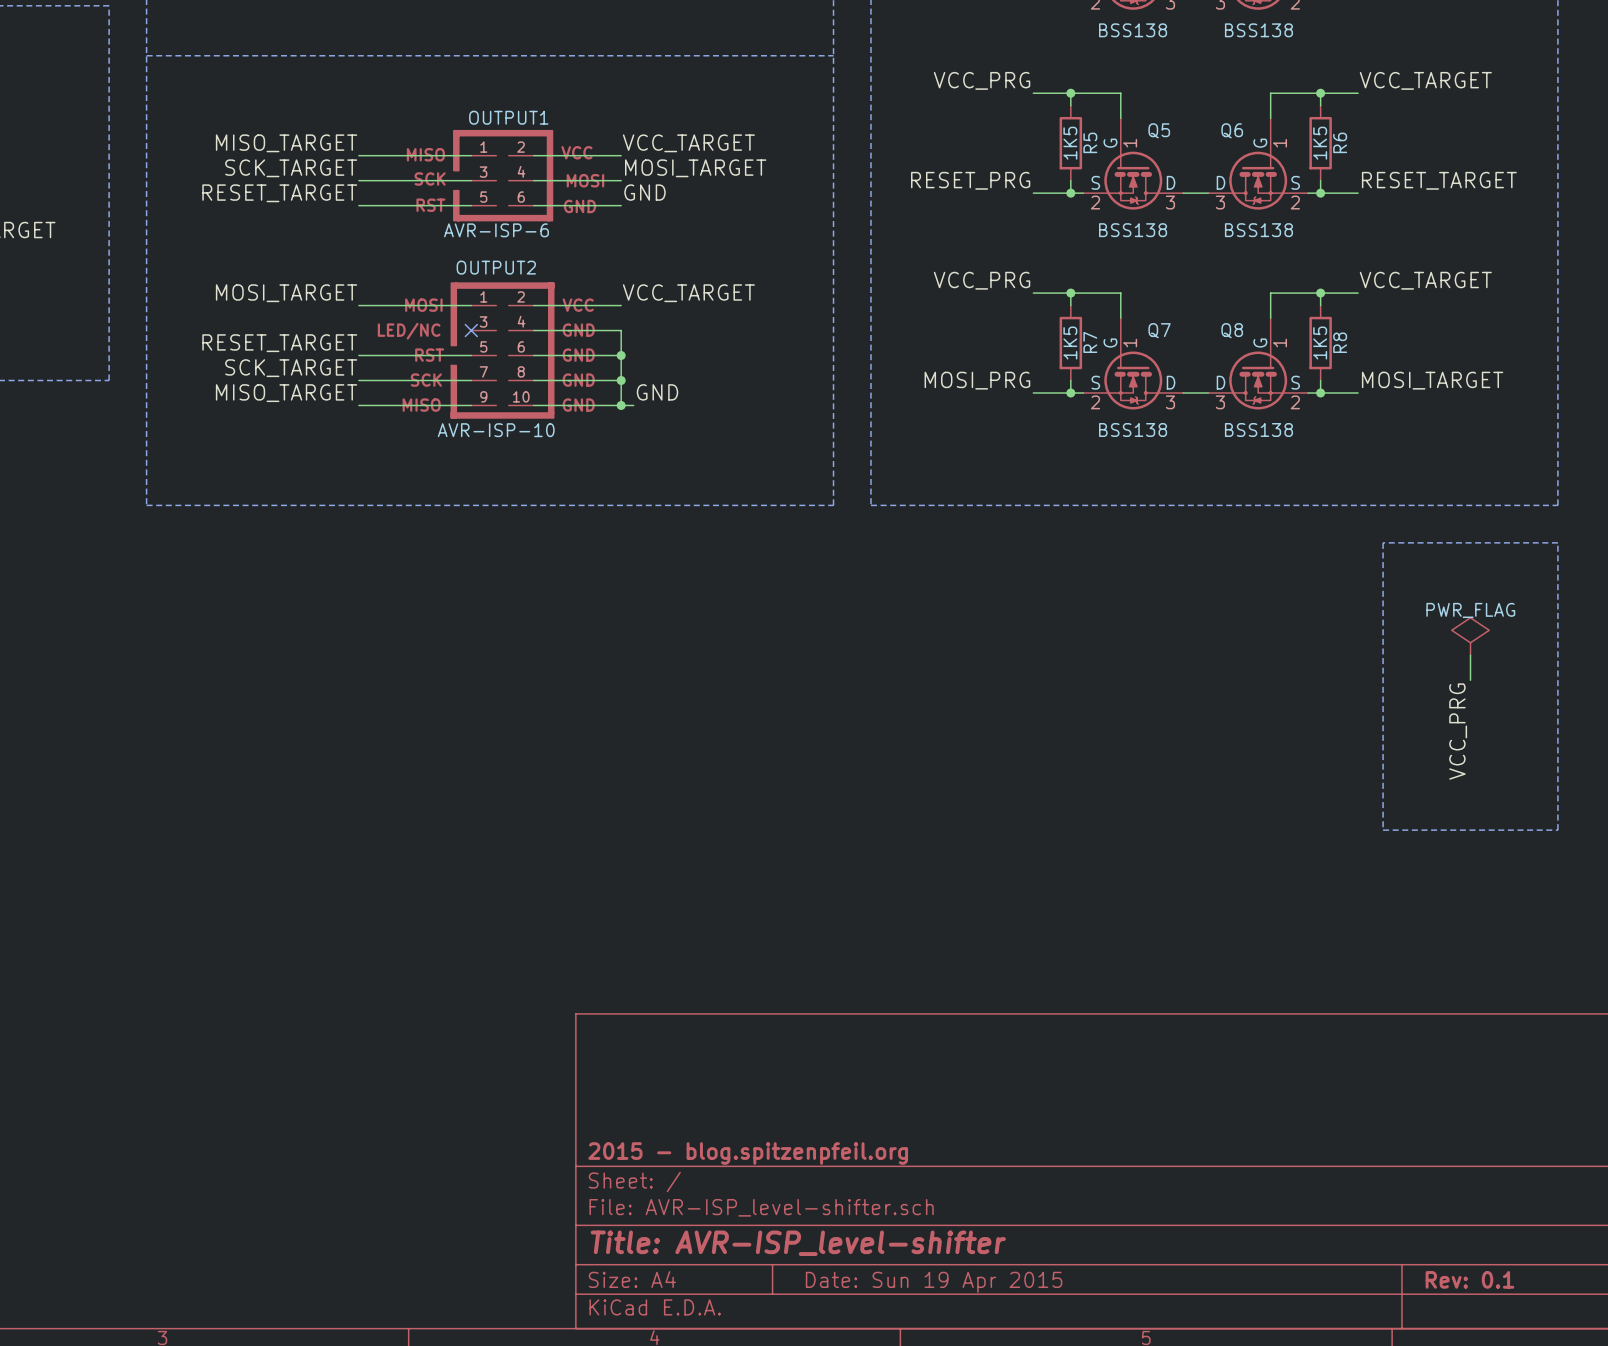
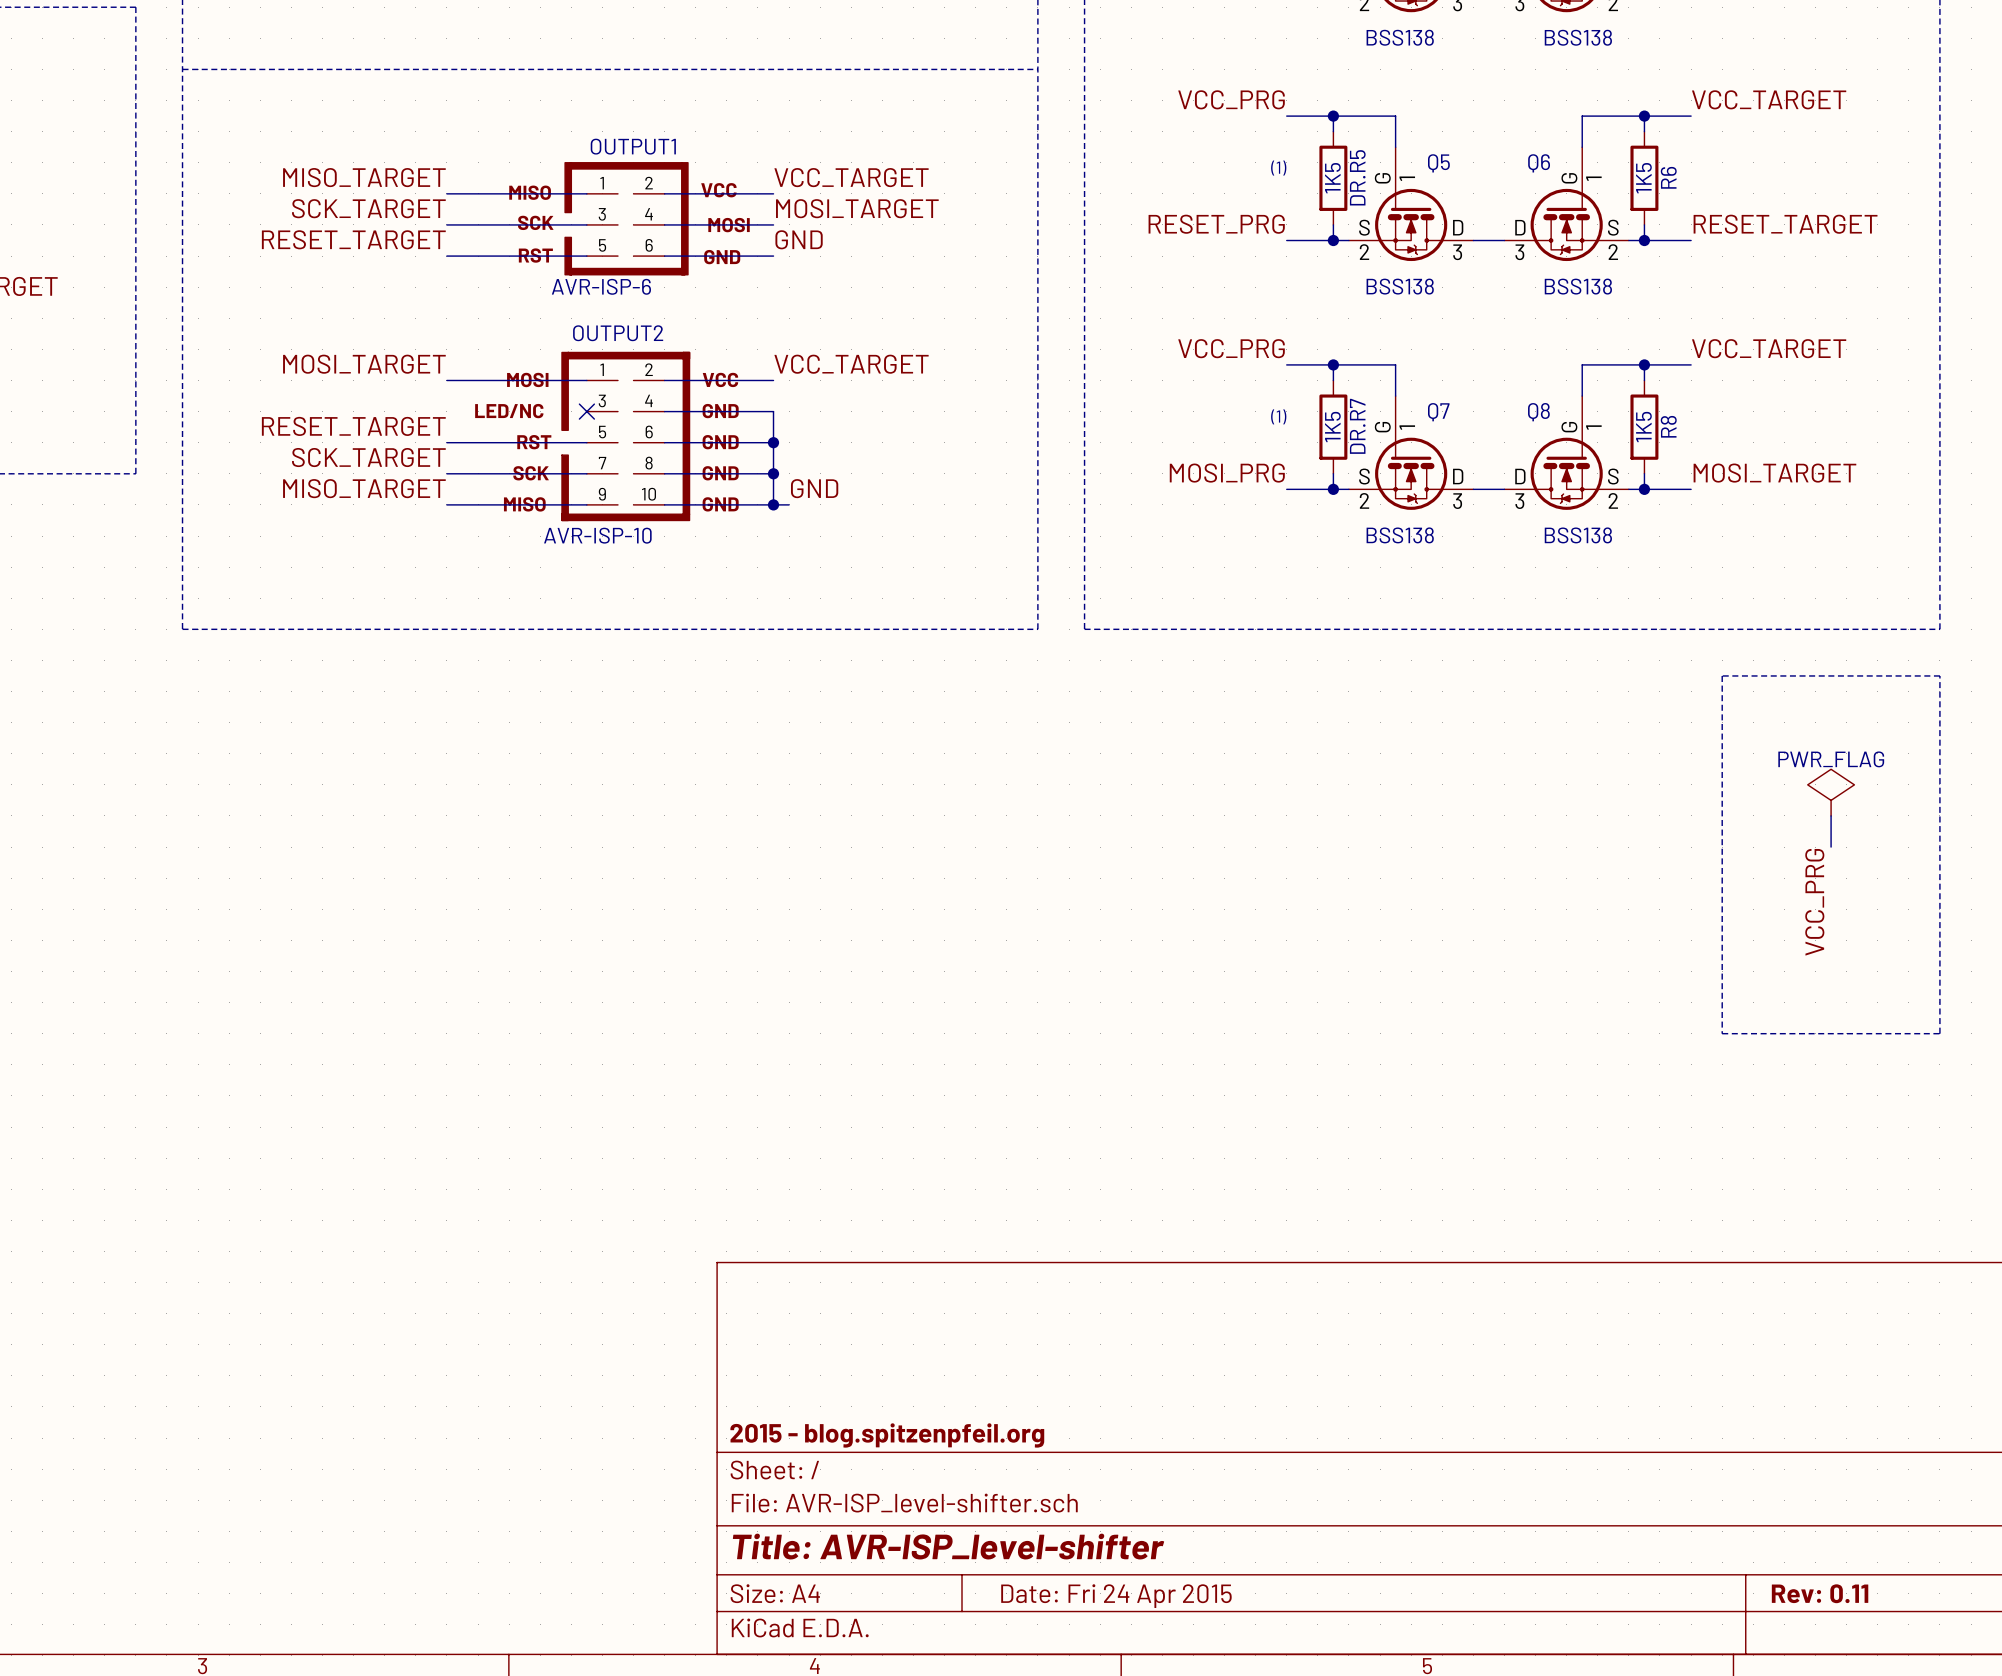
text: none -> (1) (1278, 168)
R5 name: R5 (1090, 142) -> DR.R5 (1357, 177)
text: none -> (1) (1278, 416)
R7 name: R7 (1090, 342) -> DR.R7 (1357, 426)
title block: Rev: 0.1 (1469, 1279) -> Rev: 0.11 (1820, 1593)
title block: Date: Sun 19 Apr 2015 (934, 1282) -> Date: Fri 24 Apr 2015 (1116, 1596)

